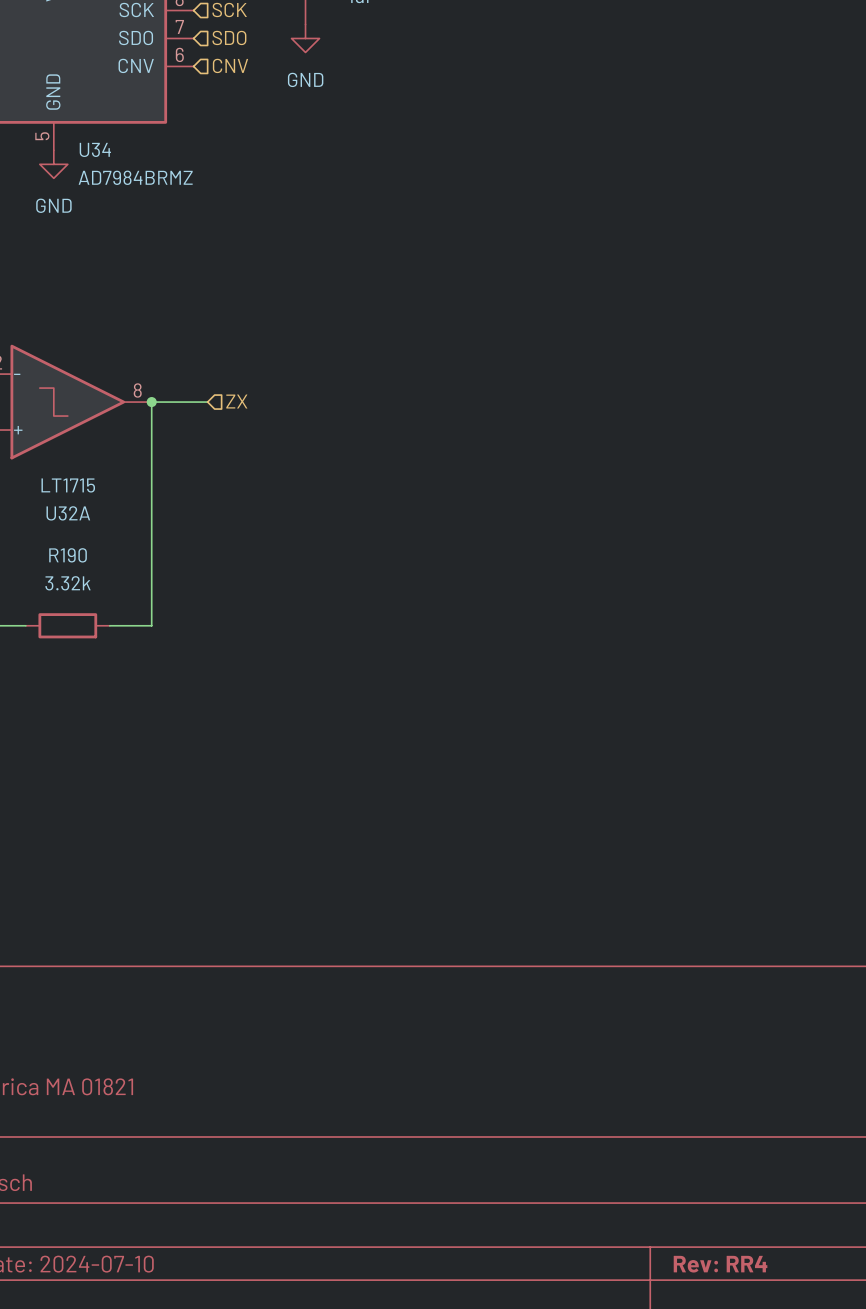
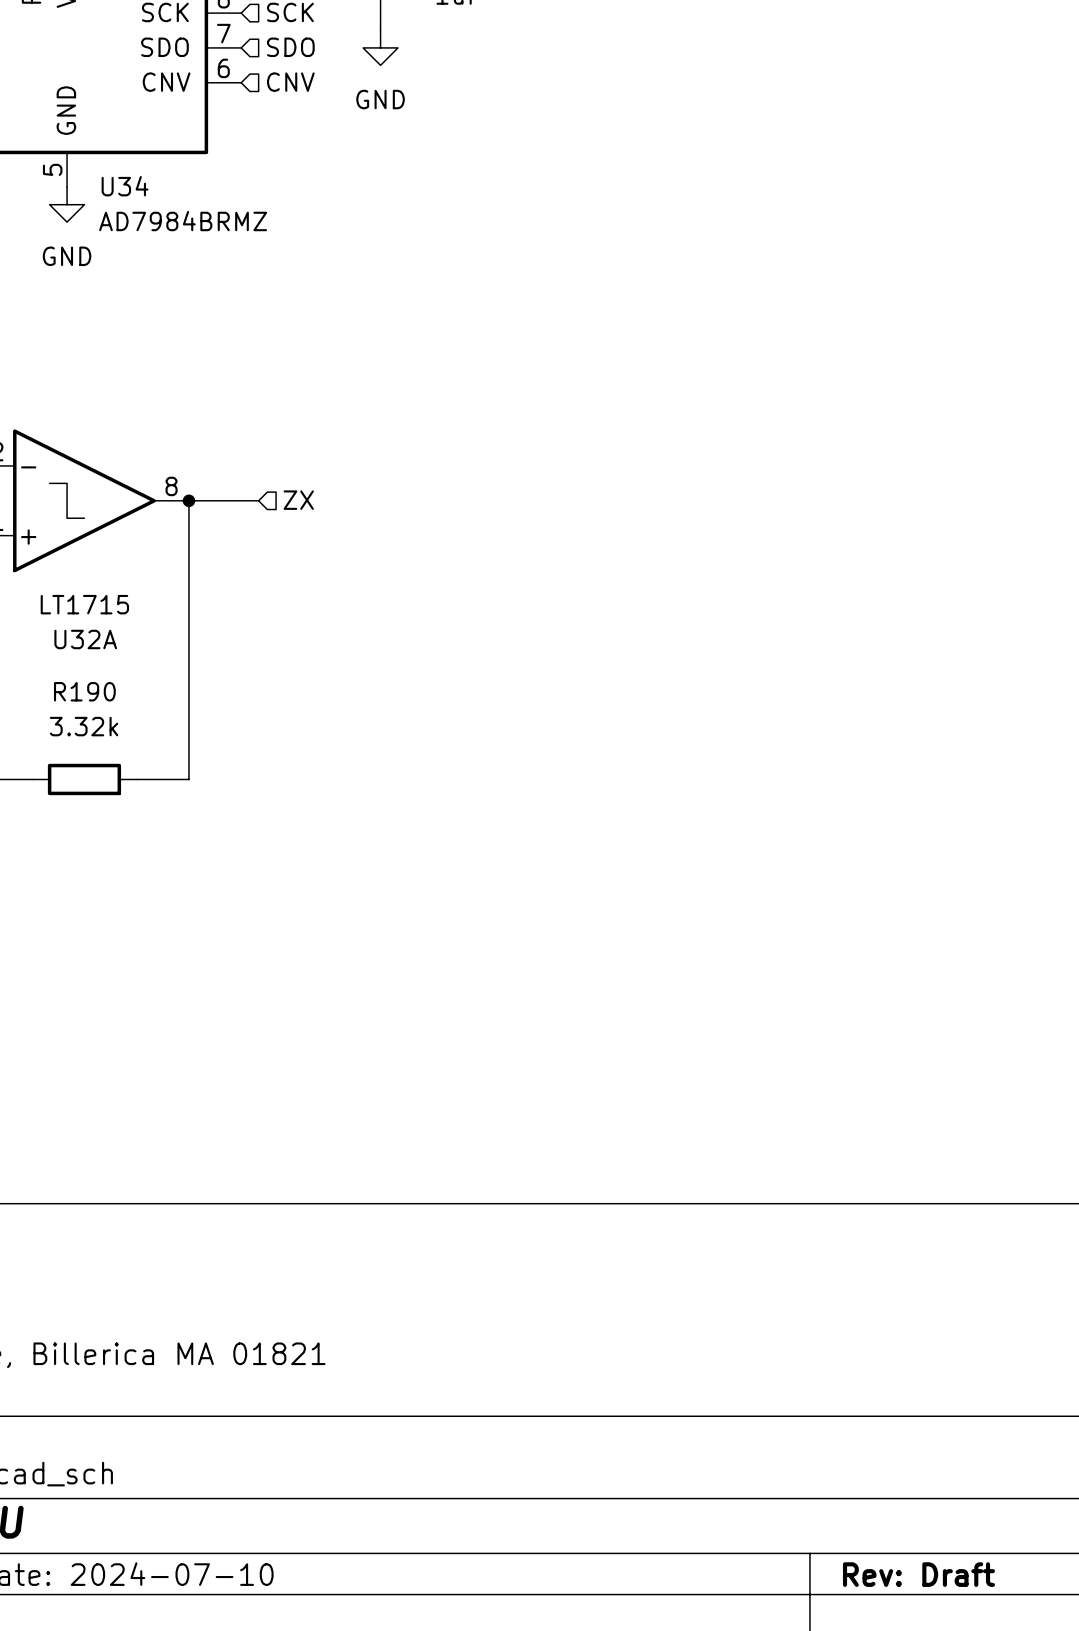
title block: Rev: RR4 (720, 1264) -> Rev: Draft (918, 1574)

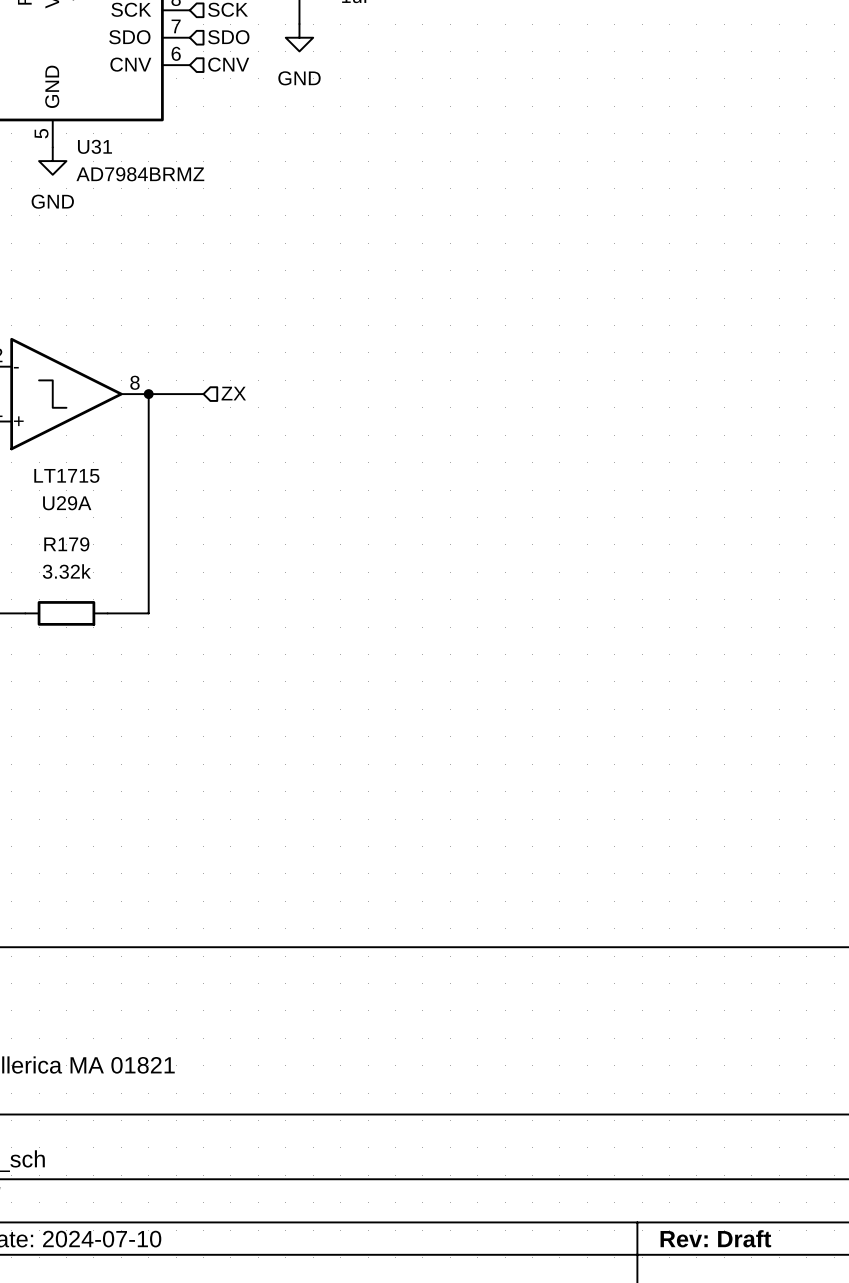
U34 name: U34 (125, 186) -> U31 (94, 146)
U32A name: U32A (85, 639) -> U29A (67, 503)
R190 name: R190 (84, 691) -> R179 (66, 544)

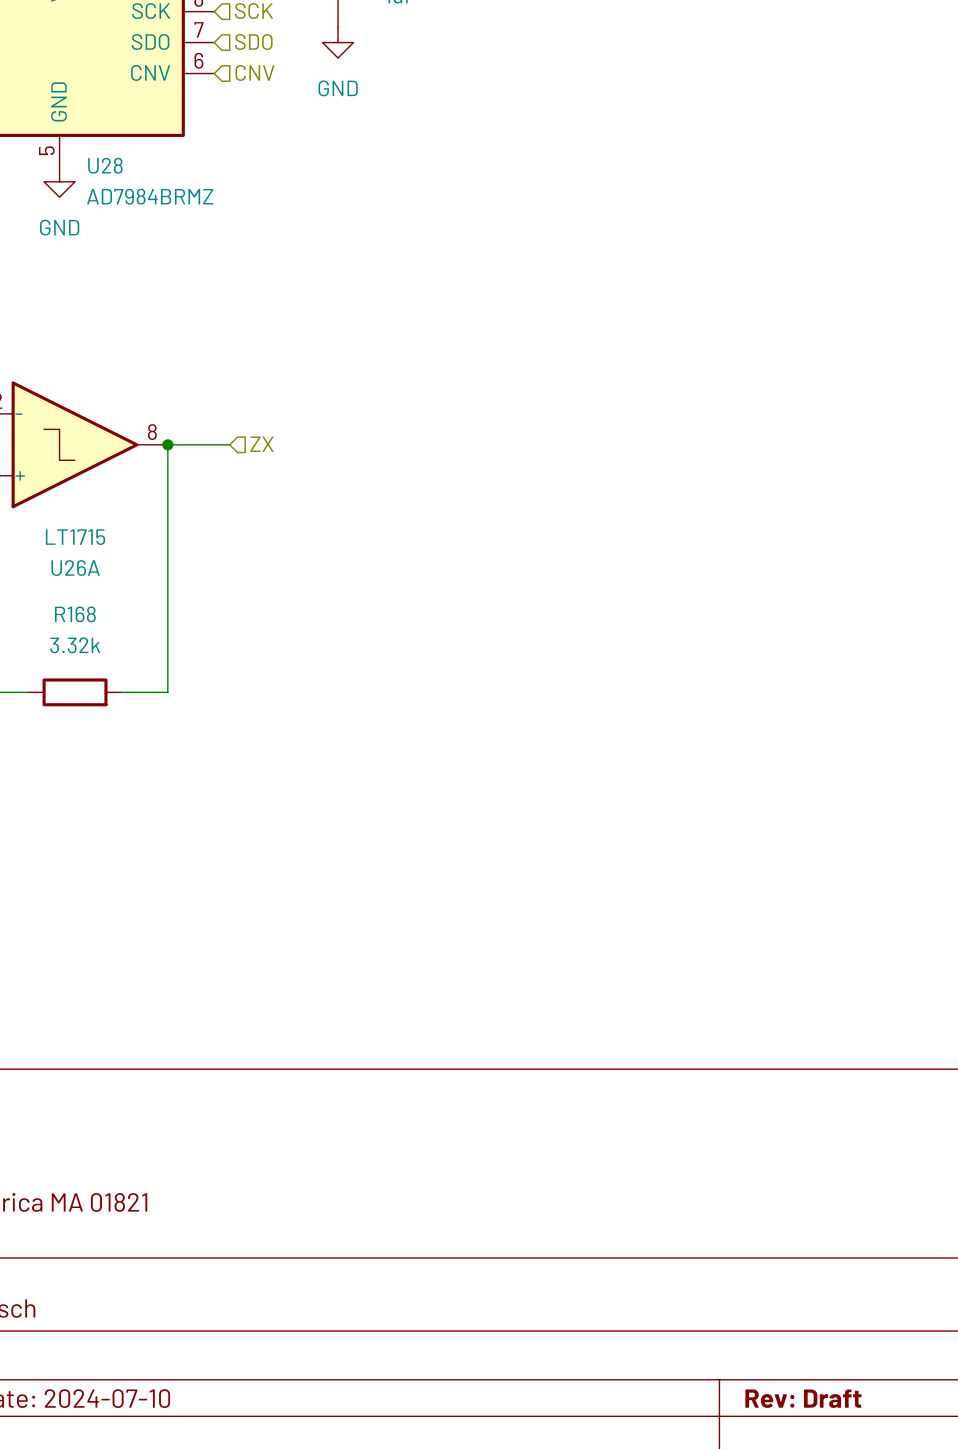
U31 name: U31 (94, 146) -> U28 (105, 165)
U29A name: U29A (67, 503) -> U26A (75, 568)
R179 name: R179 (66, 544) -> R168 (75, 614)

